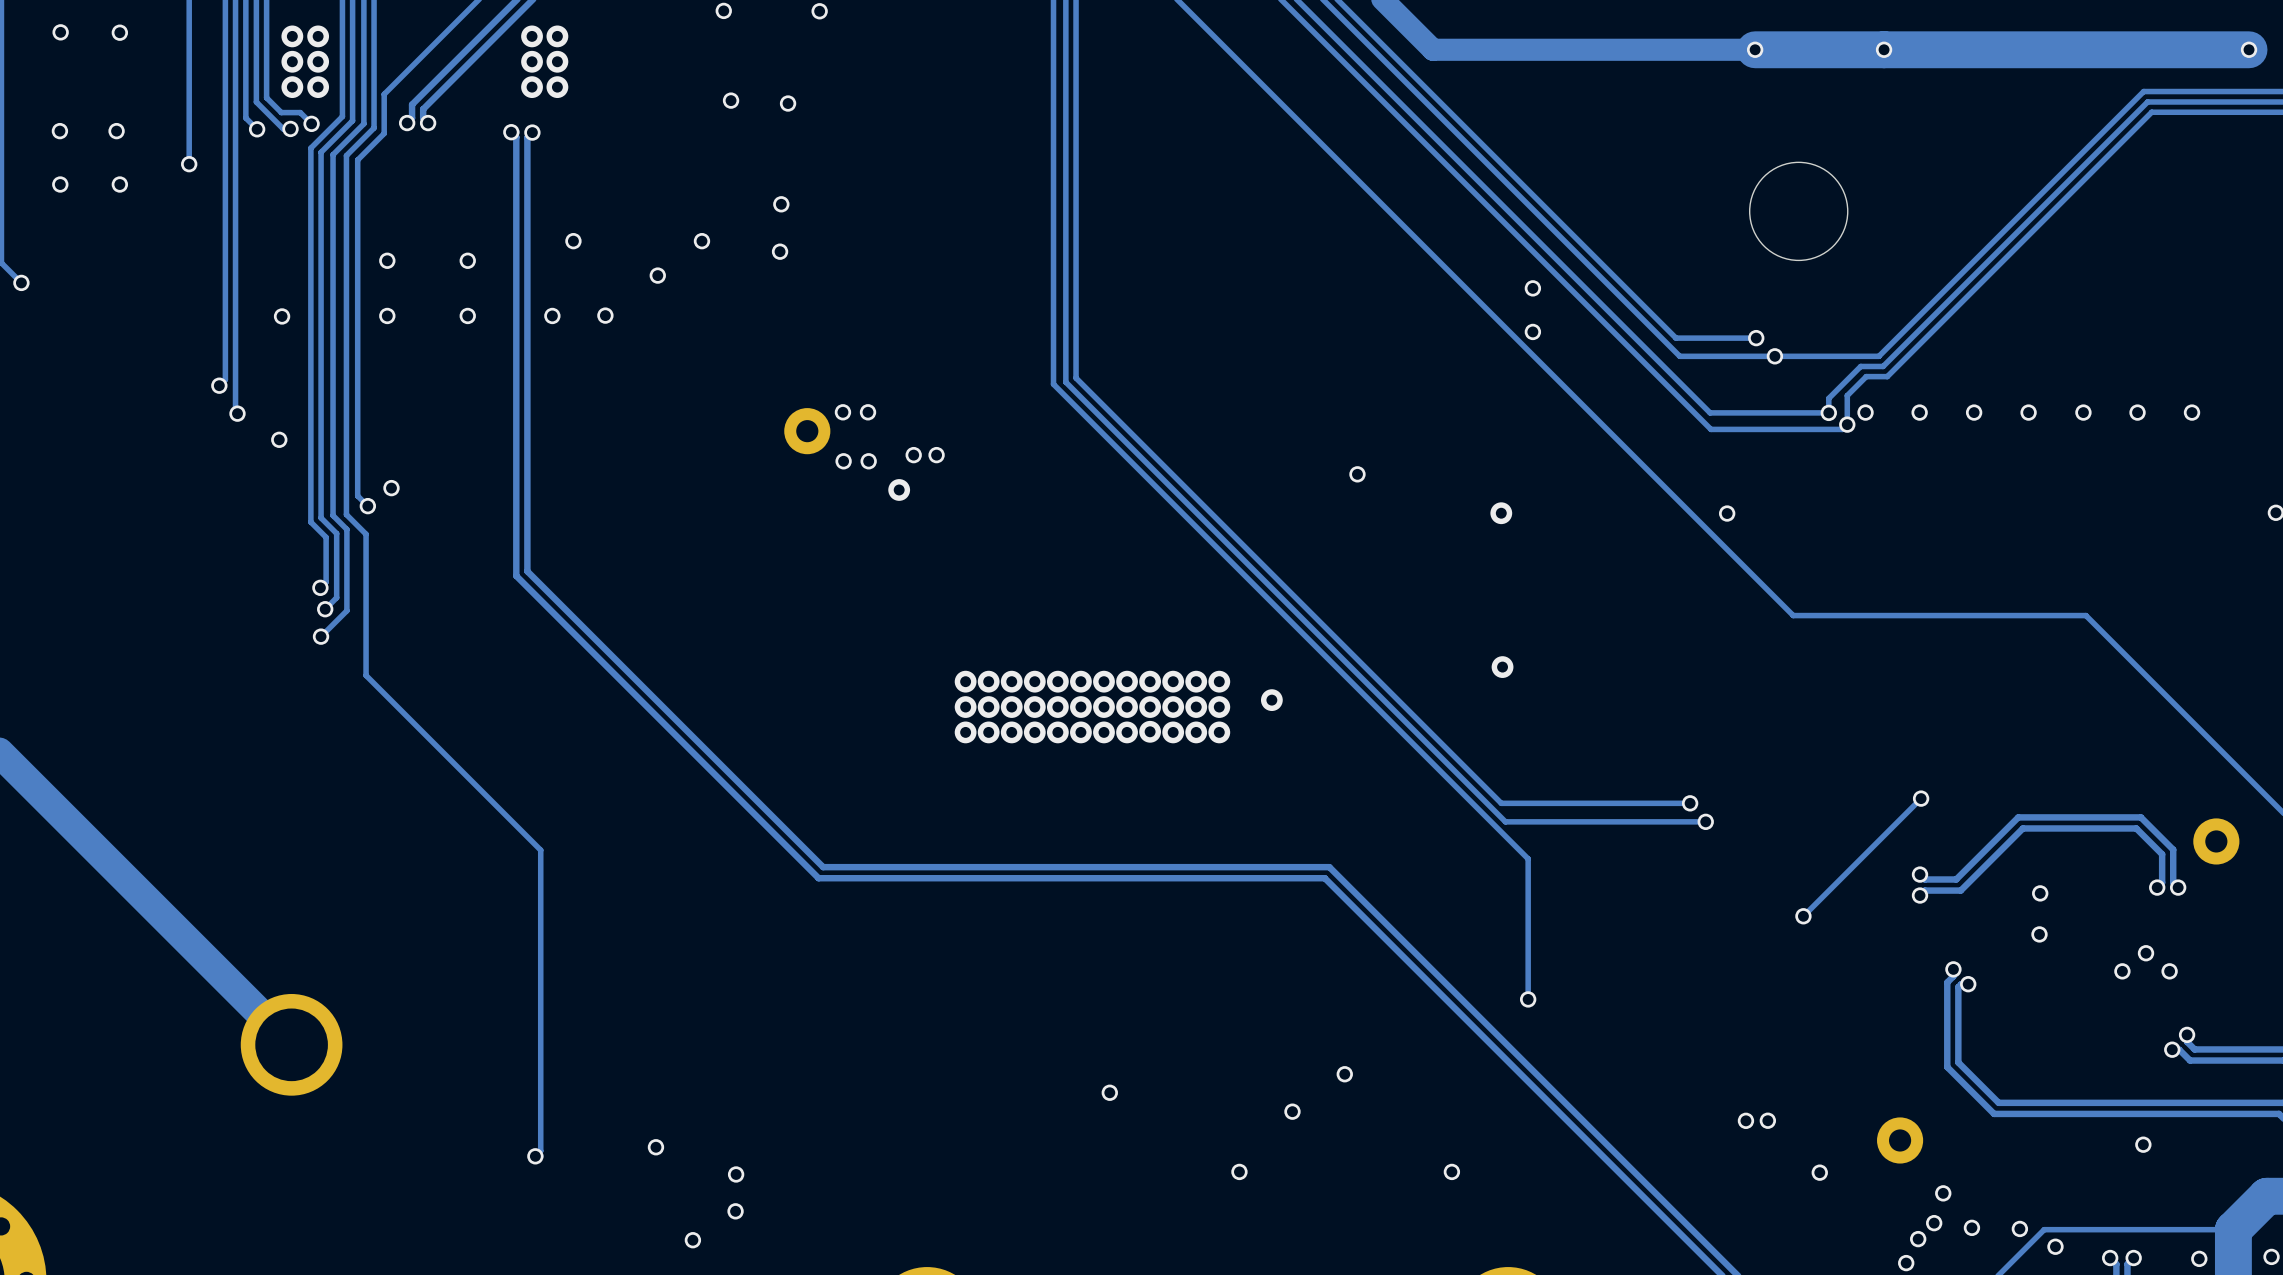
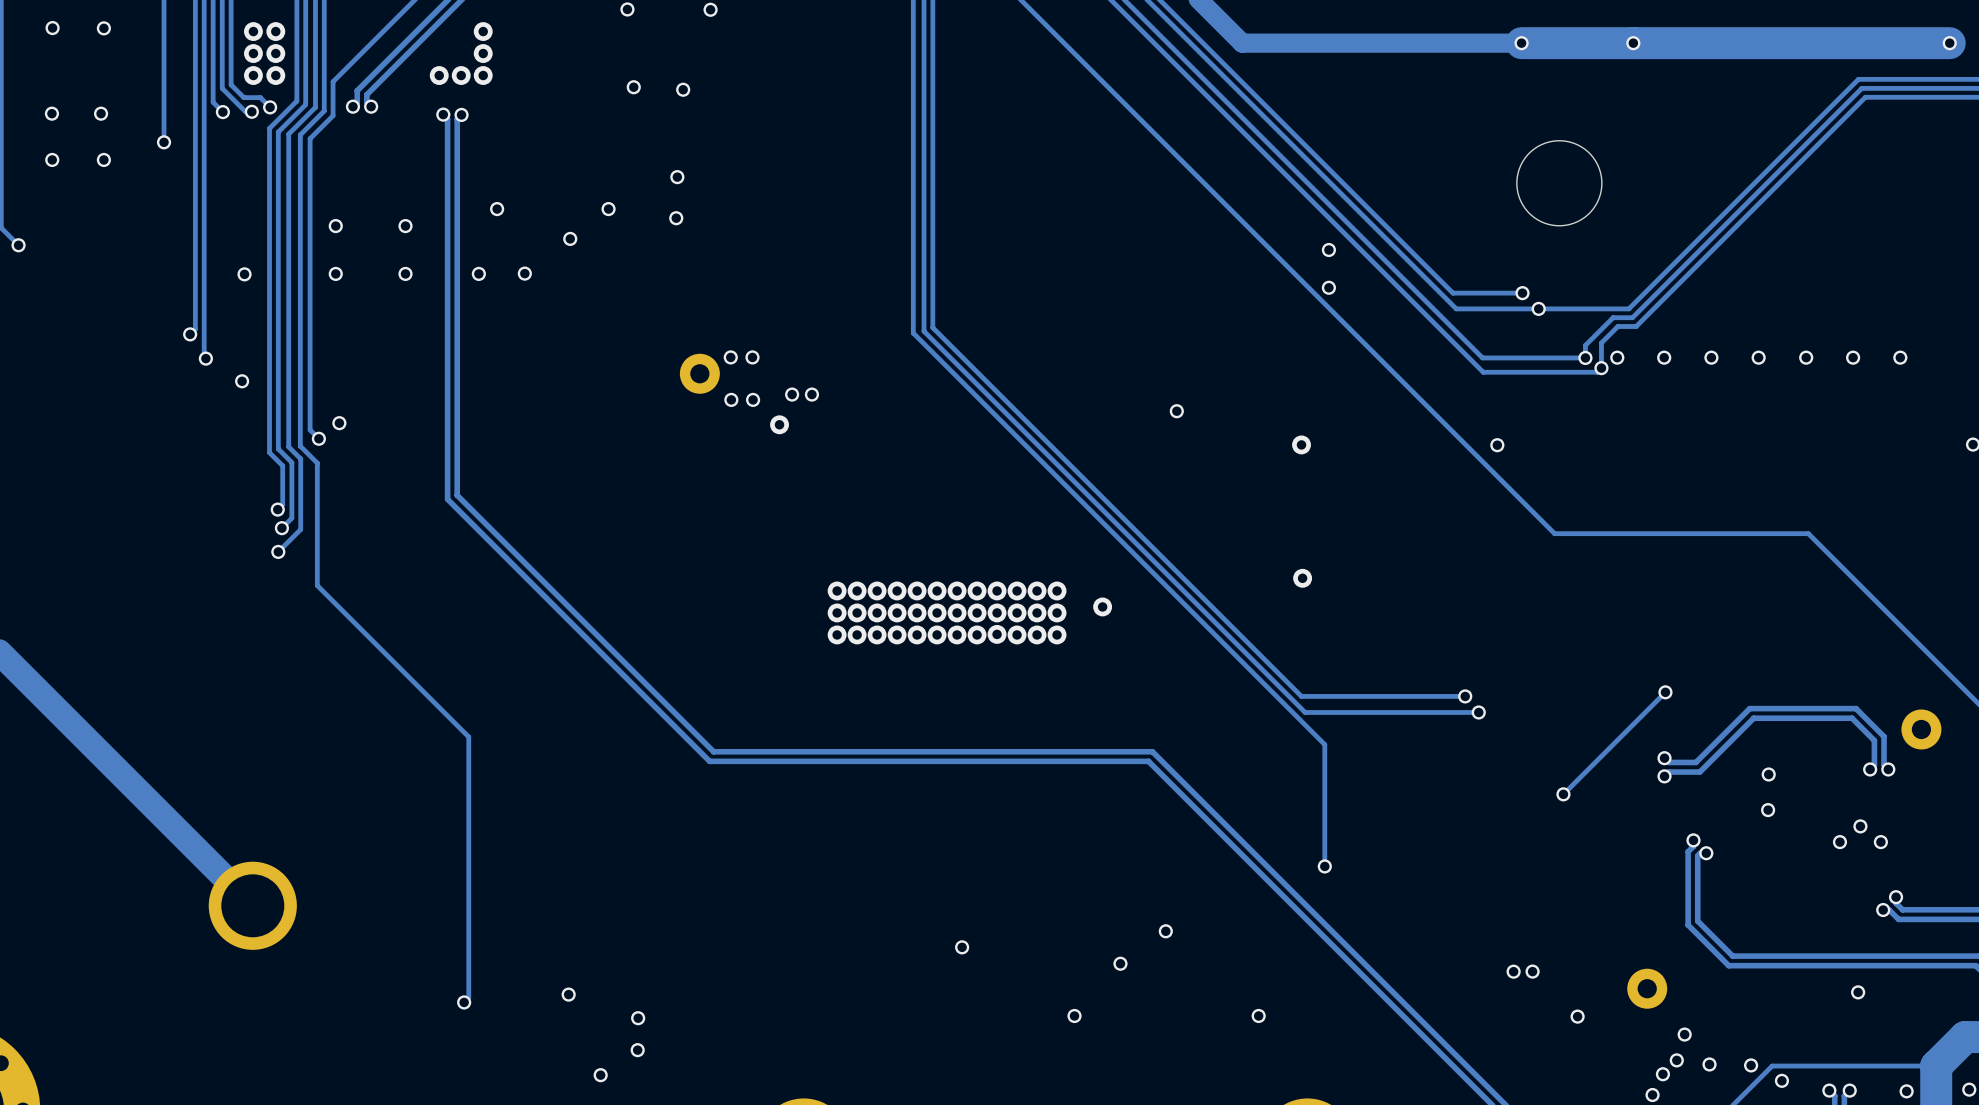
via: (532, 36) -> none
via: (532, 61) -> none
via: none -> (439, 75)

